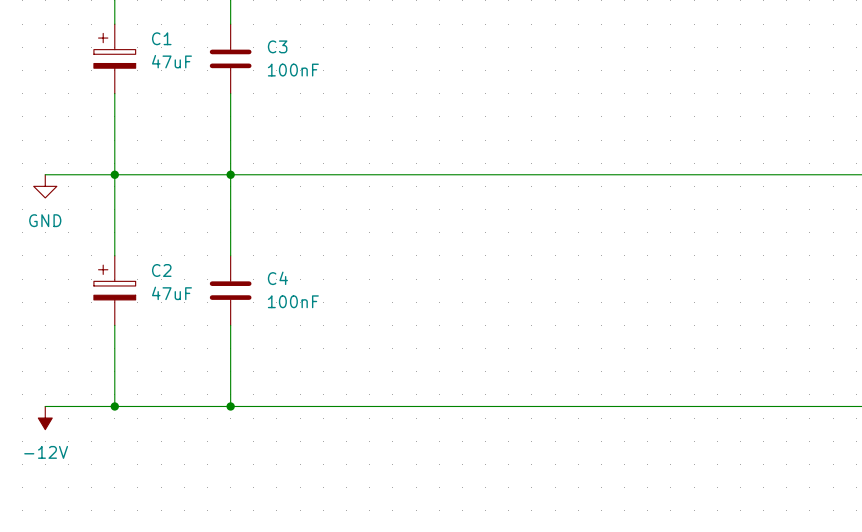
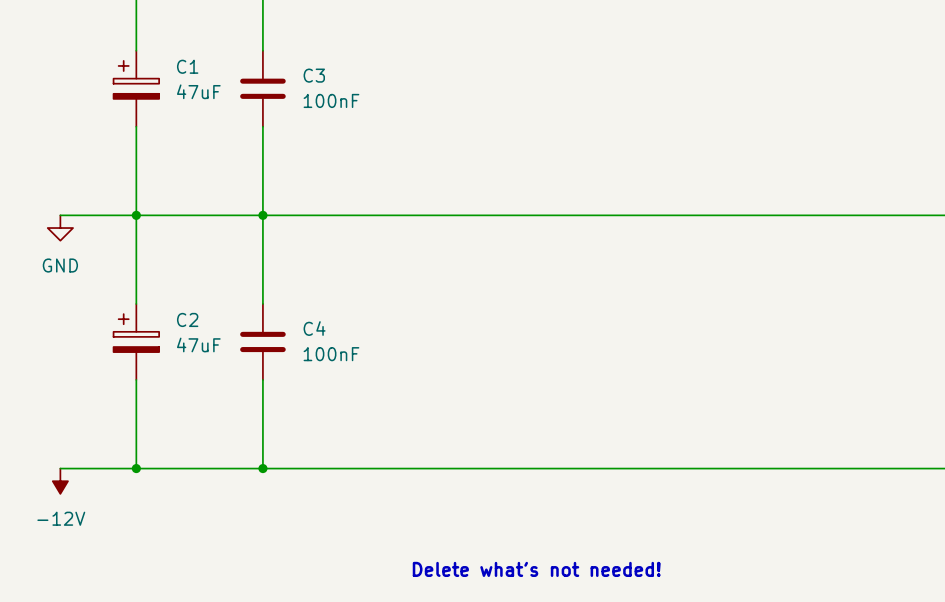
text: none -> Delete what's not needed! (536, 569)

